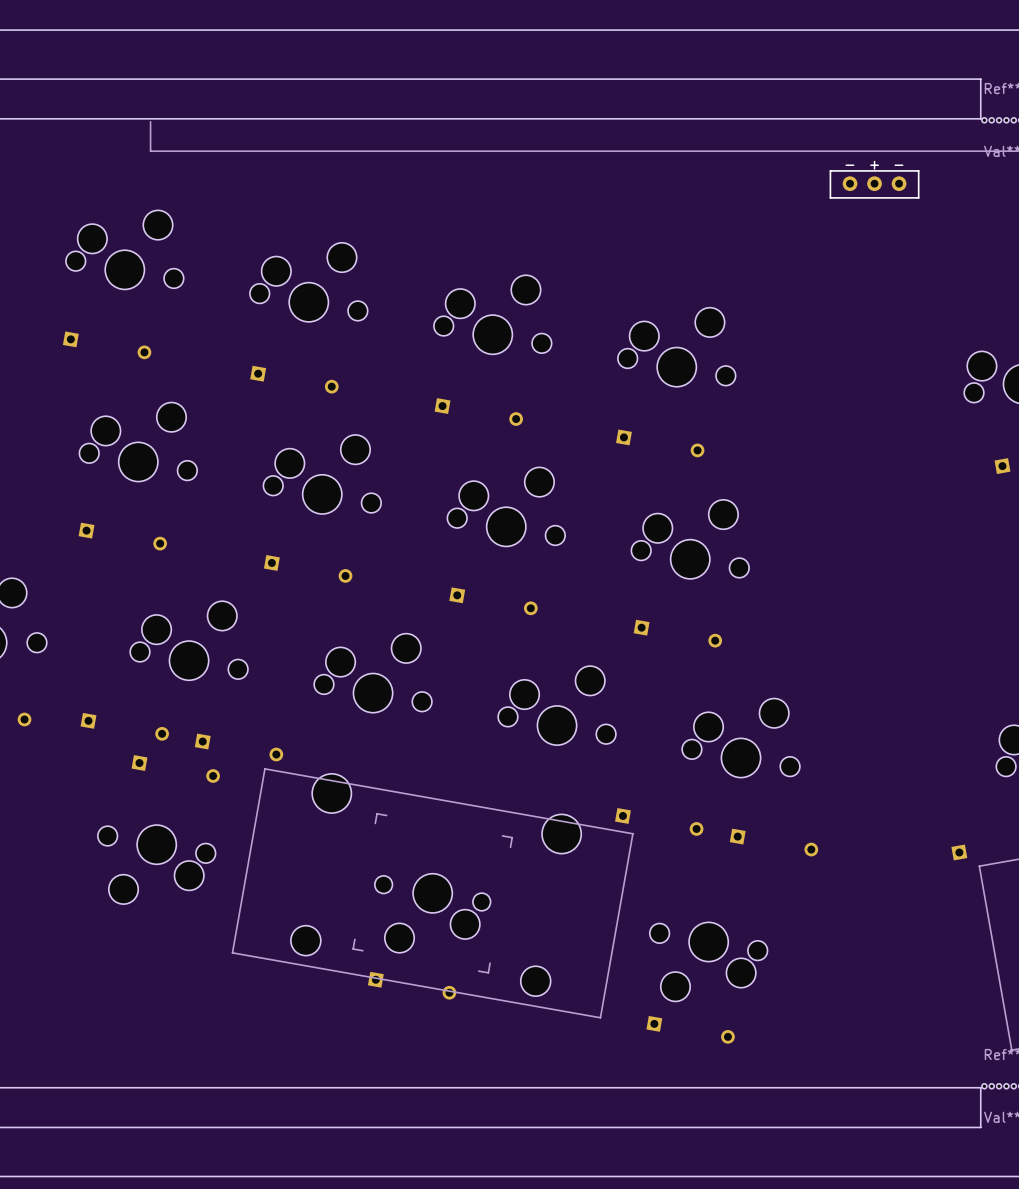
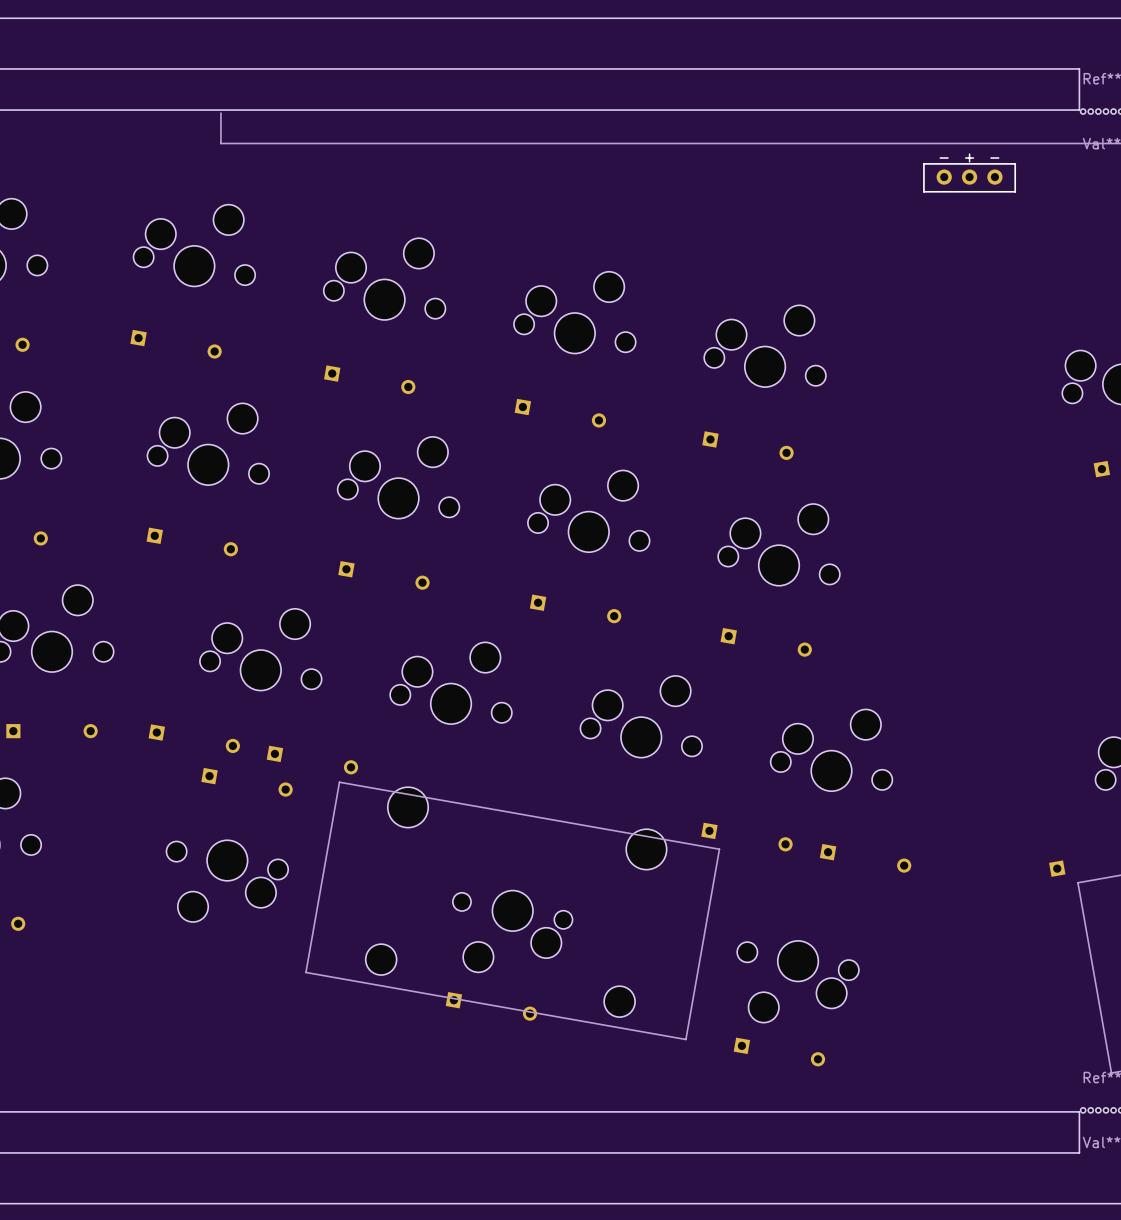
part footprint: [231, 768, 634, 1019] -> [305, 781, 721, 1041]

